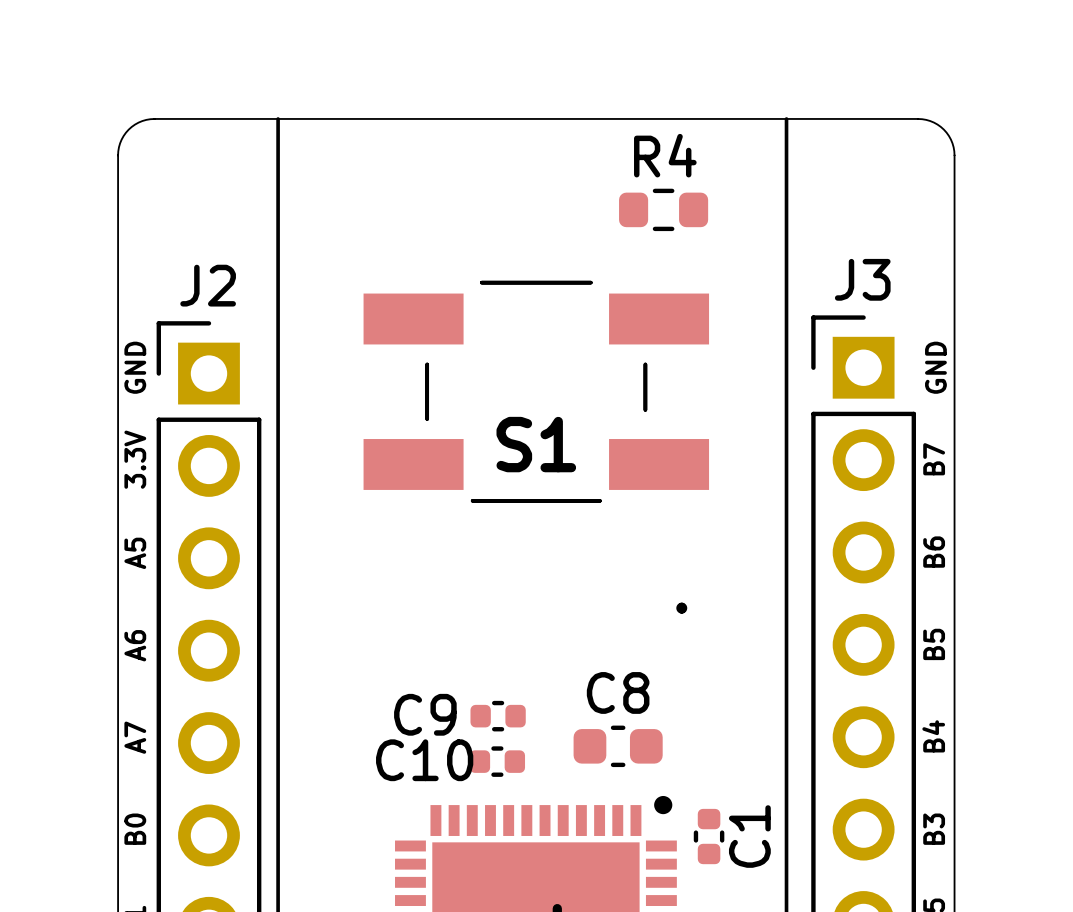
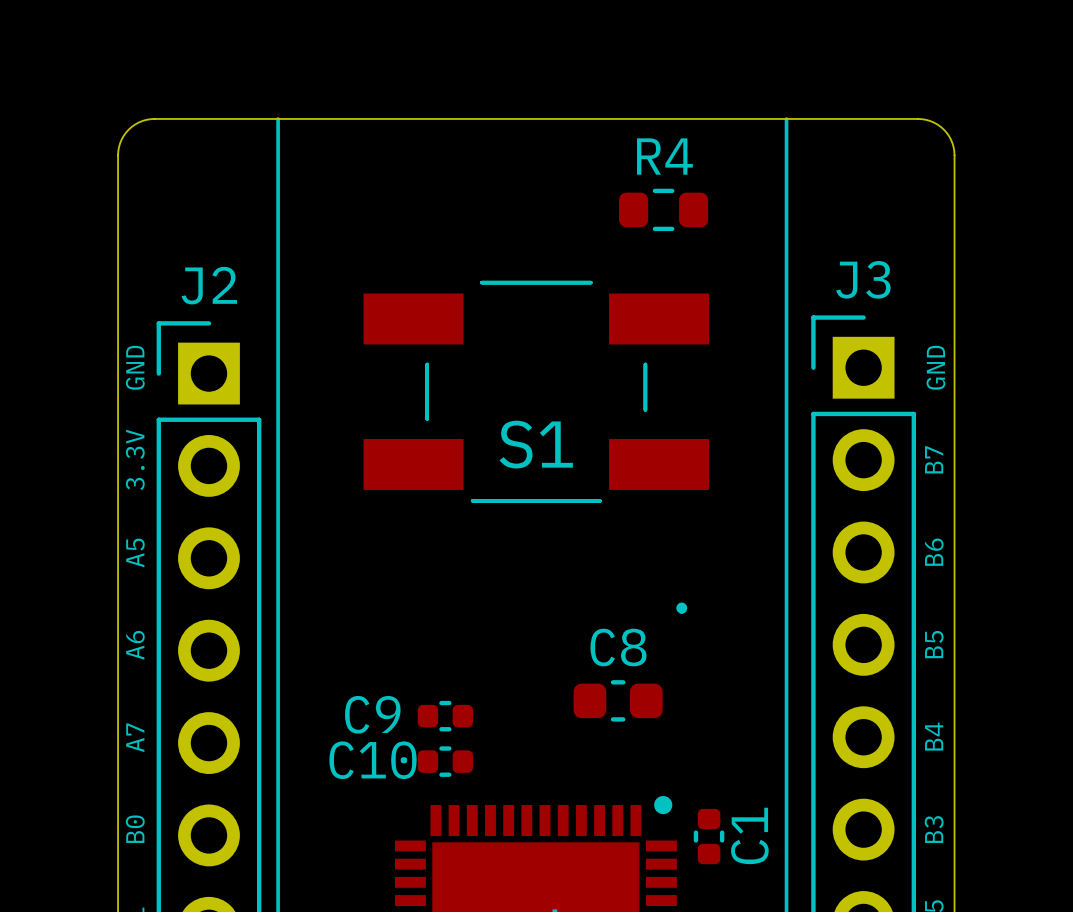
C9 position: (498, 716) -> (445, 716)
C8 position: (618, 746) -> (618, 700)
C10 position: (497, 761) -> (445, 761)

